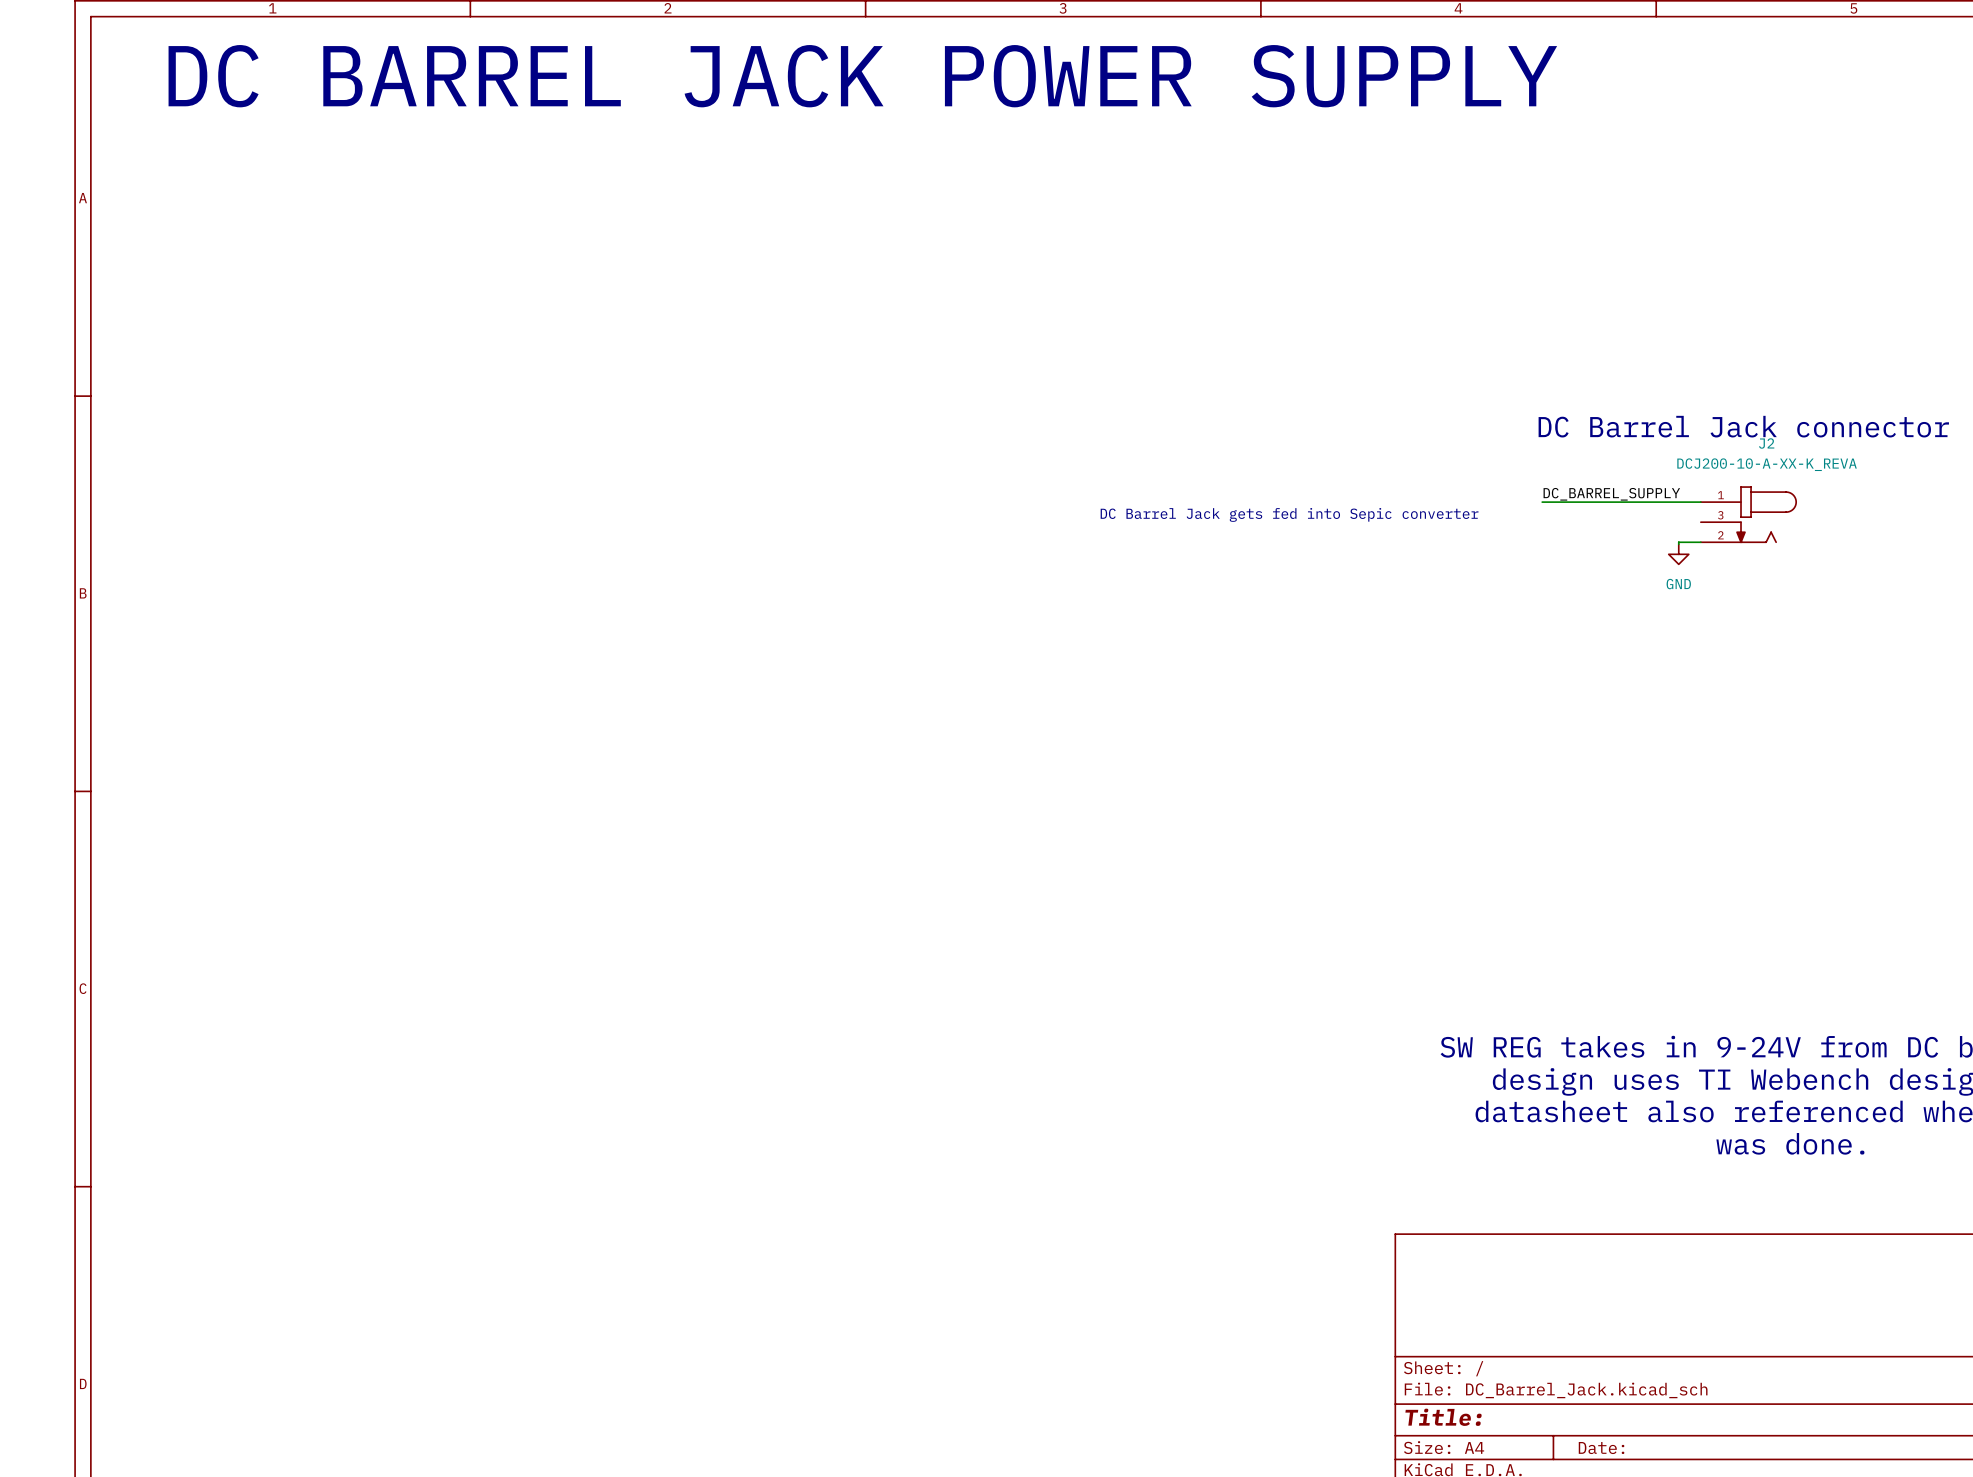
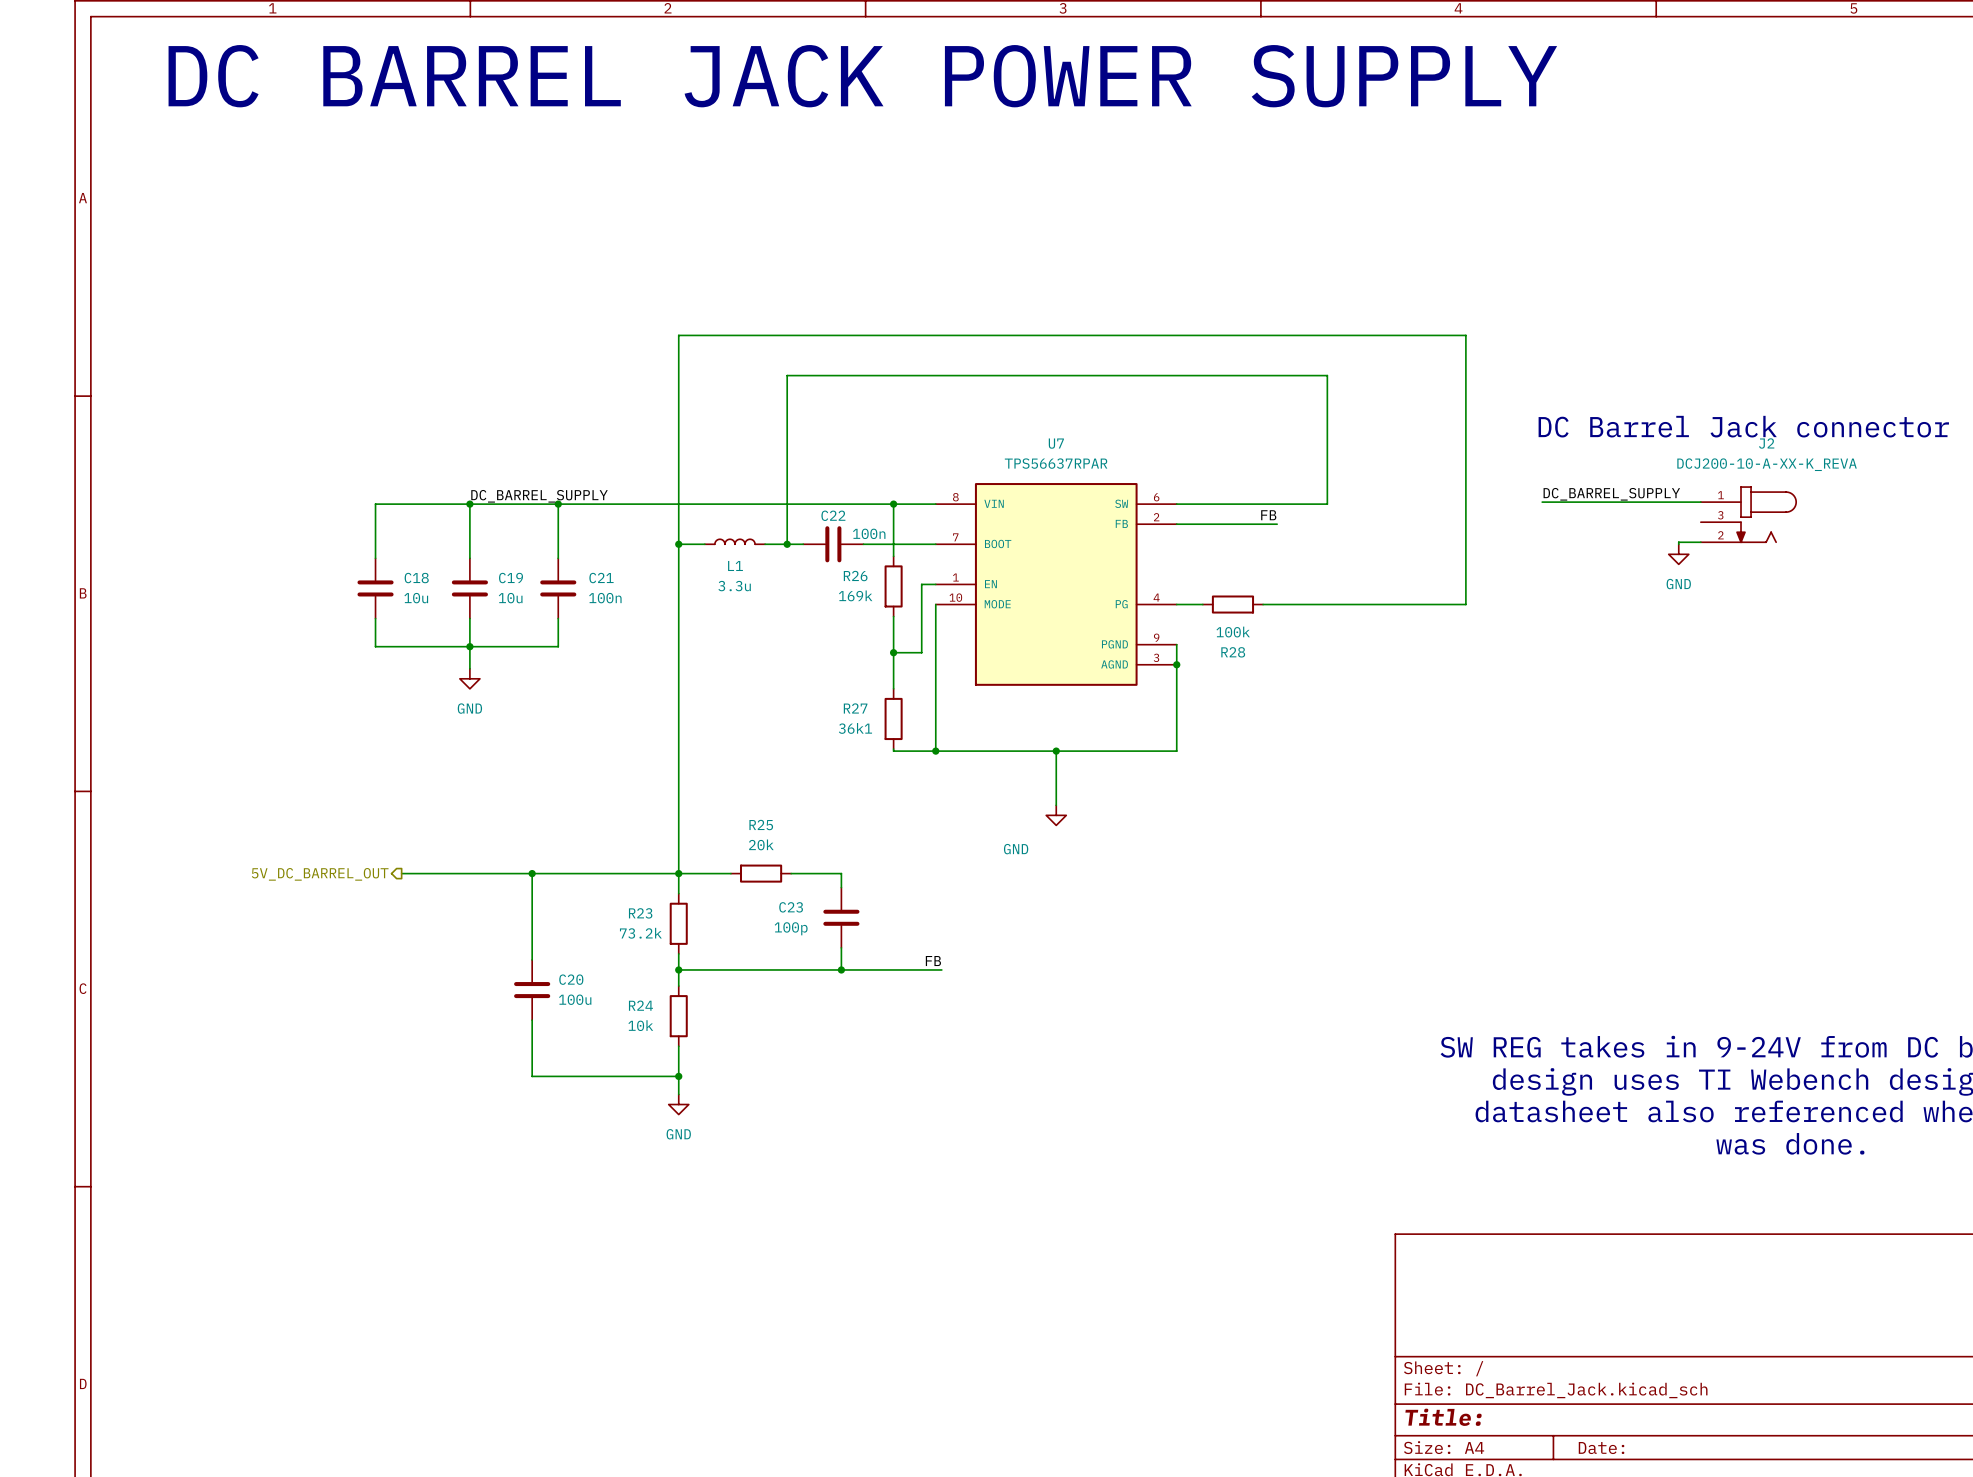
label: none -> DC_BARREL_SUPPLY (539, 496)
wire: none -> (469, 504) (469, 558)
junction: none -> (469, 504)
wire: none -> (558, 504) (558, 558)
junction: none -> (558, 504)
wire: none -> (893, 504) (893, 556)
junction: none -> (893, 504)
wire: none -> (935, 504) (375, 504) (375, 558)
wire: none -> (1176, 504) (1327, 504) (1327, 375) (787, 375) (787, 544)
text: DC Barrel Jack gets fed into Sepic converter (1289, 514) -> none
label: none -> FB (1268, 515)
wire: none -> (1176, 524) (1277, 524)
L1: none -> 3.3u (734, 541)
wire: none -> (678, 544) (704, 544)
junction: none -> (678, 544)
wire: none -> (765, 544) (803, 544)
junction: none -> (787, 544)
C22: none -> 100n (833, 544)
wire: none -> (863, 544) (935, 544)
wire: none -> (935, 584) (921, 584) (921, 652) (893, 652)
U7: none -> TPS56637RPAR (1056, 584)
R26: none -> 169k (893, 586)
C18: none -> 10u (375, 588)
C19: none -> 10u (469, 588)
C21: none -> 100n (558, 588)
wire: none -> (935, 604) (935, 751)
wire: none -> (1176, 604) (1202, 604)
R28: none -> 100k (1232, 604)
wire: none -> (1263, 604) (1465, 604) (1465, 335) (678, 335) (678, 893)
wire: none -> (893, 616) (893, 688)
wire: none -> (375, 618) (375, 646) (558, 646) (558, 618)
wire: none -> (469, 618) (469, 668)
wire: none -> (1176, 644) (1176, 751) (893, 751) (893, 749)
junction: none -> (469, 646)
junction: none -> (893, 652)
junction: none -> (1176, 664)
power symbol: none -> GND (469, 678)
R27: none -> 36k1 (893, 718)
junction: none -> (935, 751)
wire: none -> (1056, 751) (1056, 805)
junction: none -> (1056, 751)
power symbol: none -> GND (1056, 815)
wire: none -> (401, 873) (730, 873)
wire: none -> (532, 873) (532, 959)
junction: none -> (532, 873)
junction: none -> (678, 873)
R25: none -> 20k (761, 873)
wire: none -> (791, 873) (841, 873) (841, 887)
hierarchical label: none -> 5V_DC_BARREL_OUT (320, 874)
C23: none -> 100p (841, 917)
R23: none -> 73.2k (678, 923)
wire: none -> (841, 947) (841, 969)
wire: none -> (678, 953) (678, 986)
label: none -> FB (933, 961)
wire: none -> (678, 969) (941, 969)
junction: none -> (678, 969)
junction: none -> (841, 969)
C20: none -> 100u (532, 990)
R24: none -> 10k (678, 1016)
wire: none -> (532, 1020) (532, 1076) (678, 1076)
wire: none -> (678, 1046) (678, 1094)
junction: none -> (678, 1076)
power symbol: none -> GND (678, 1104)

